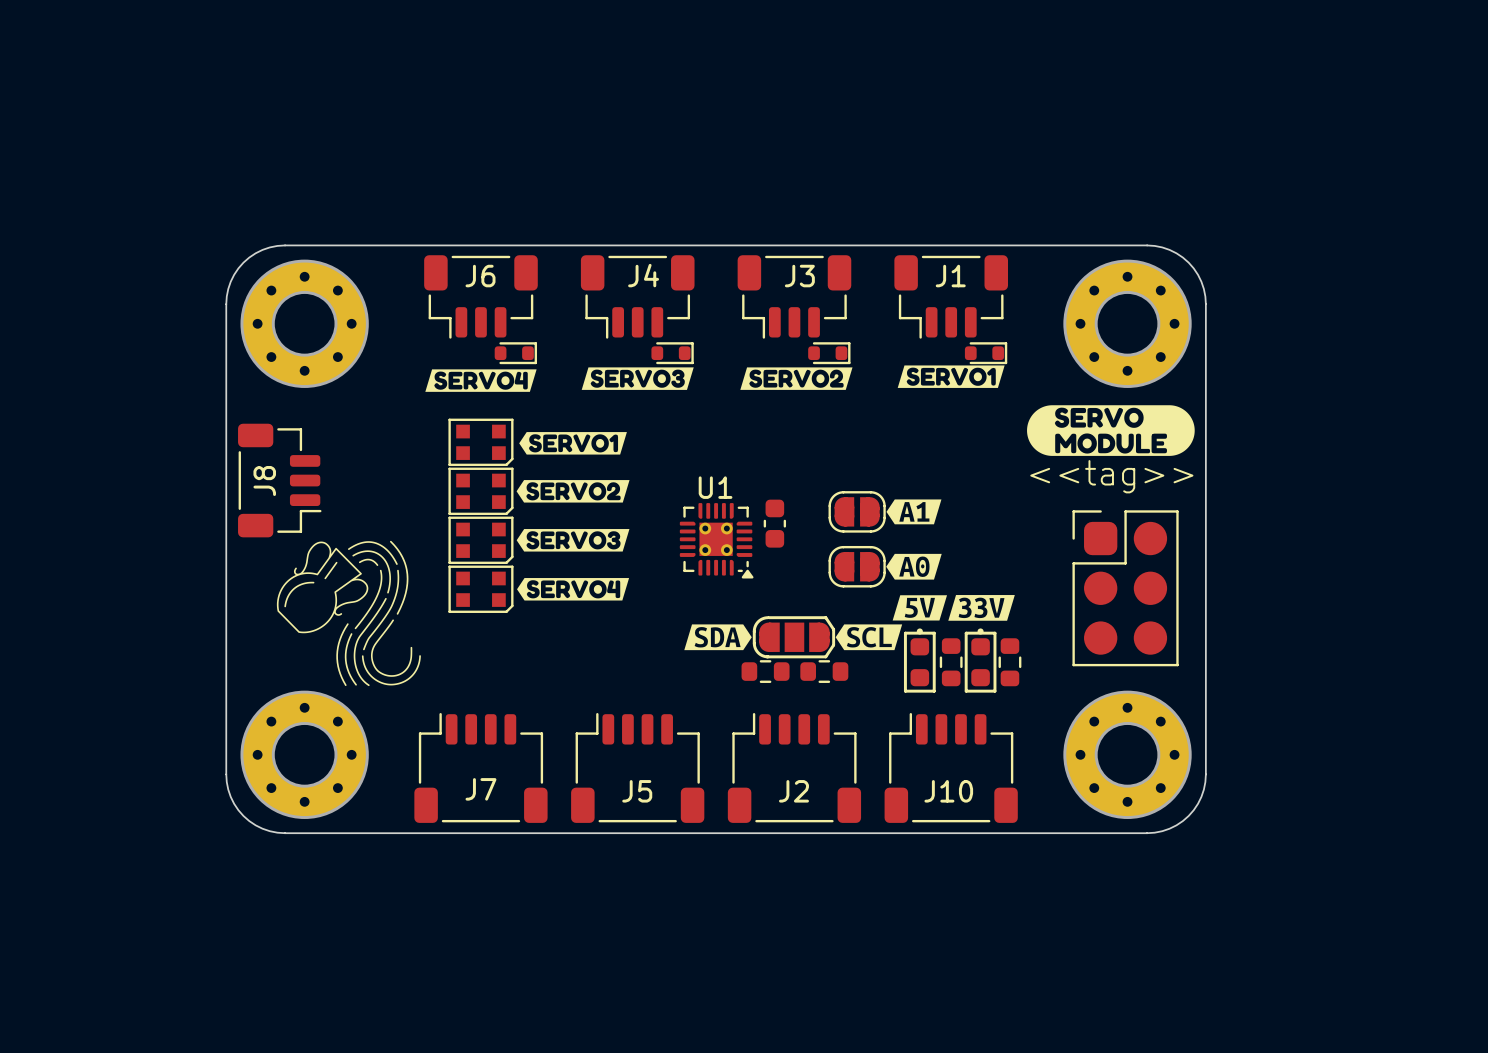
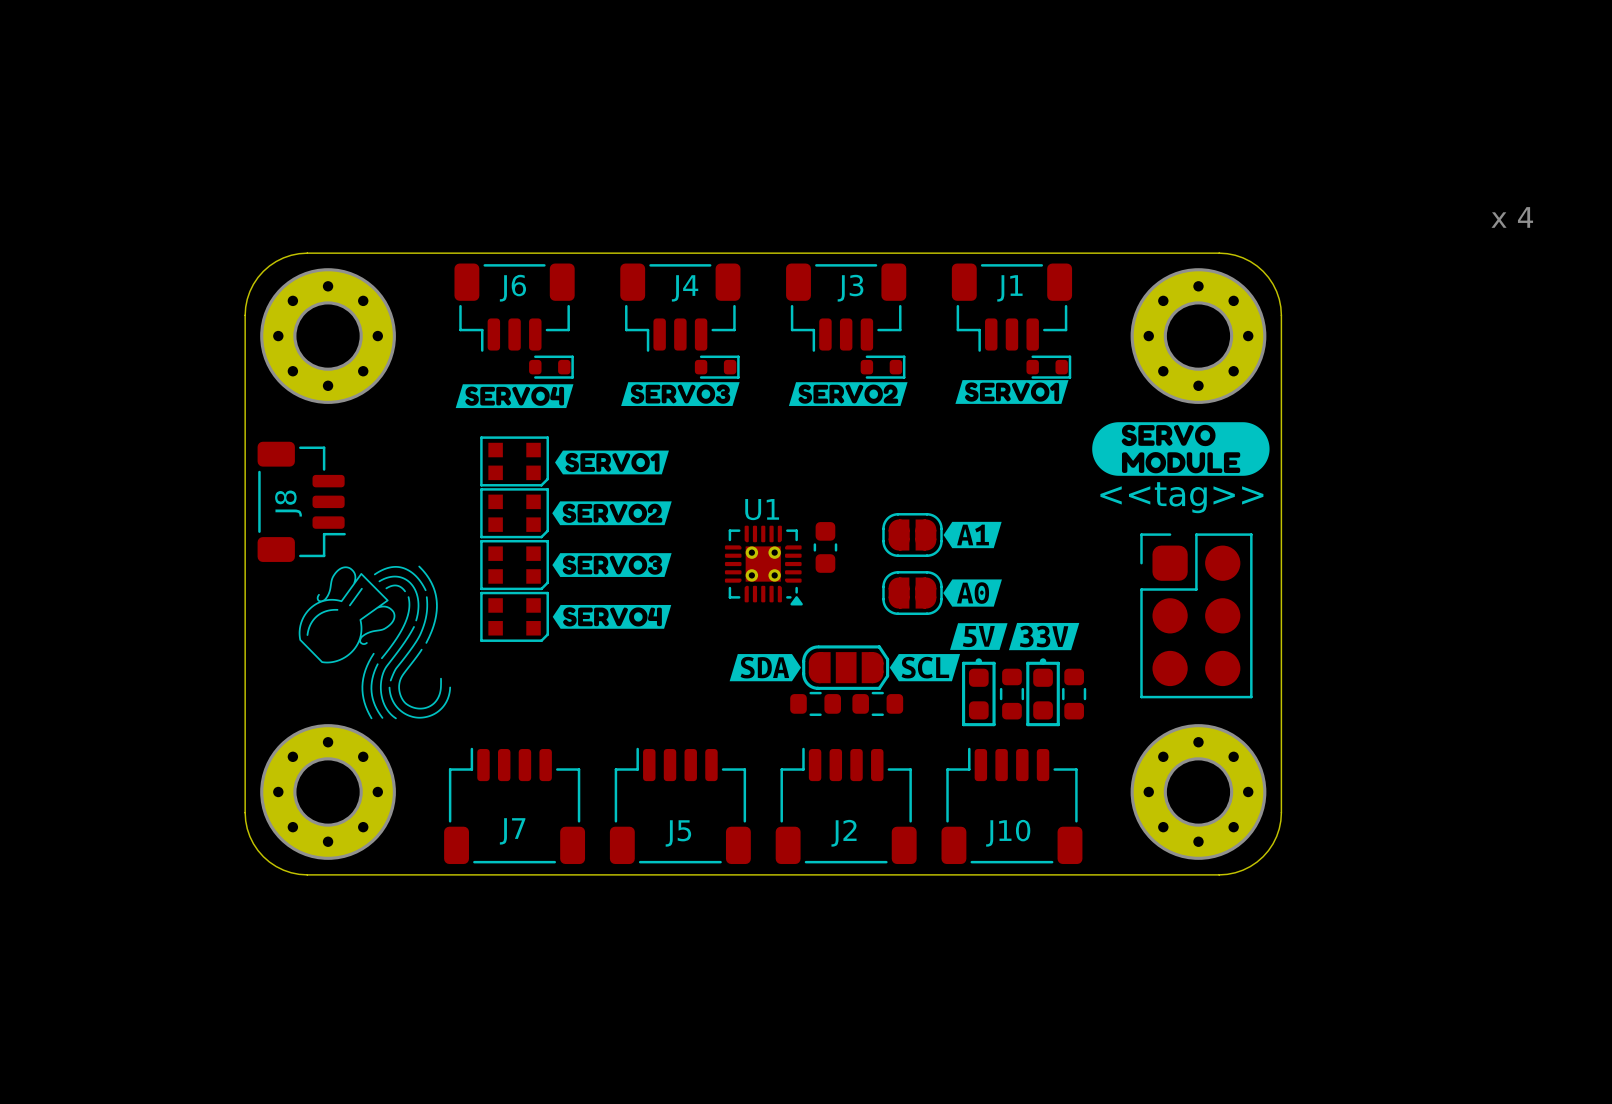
text: none -> x 4 (1512, 217)

